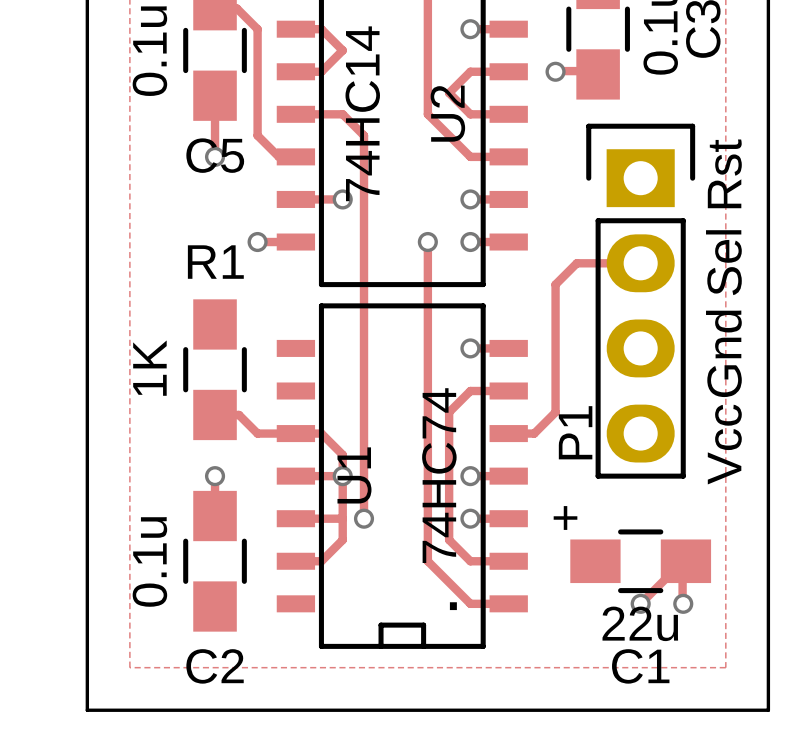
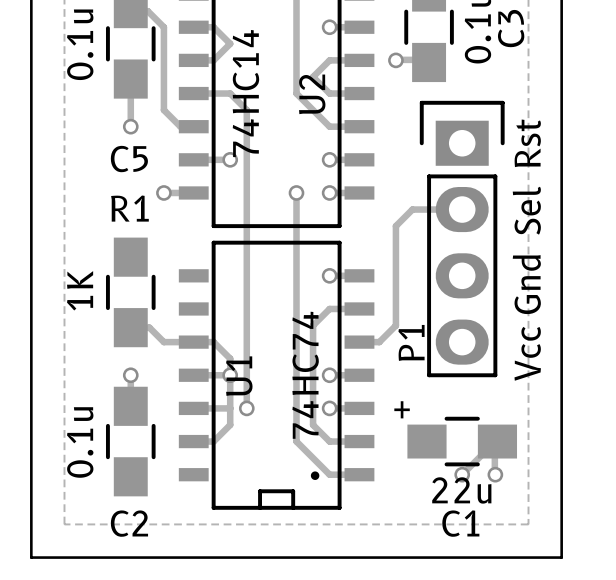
C5 name position: C5 (215, 155) -> C5 (129, 159)

